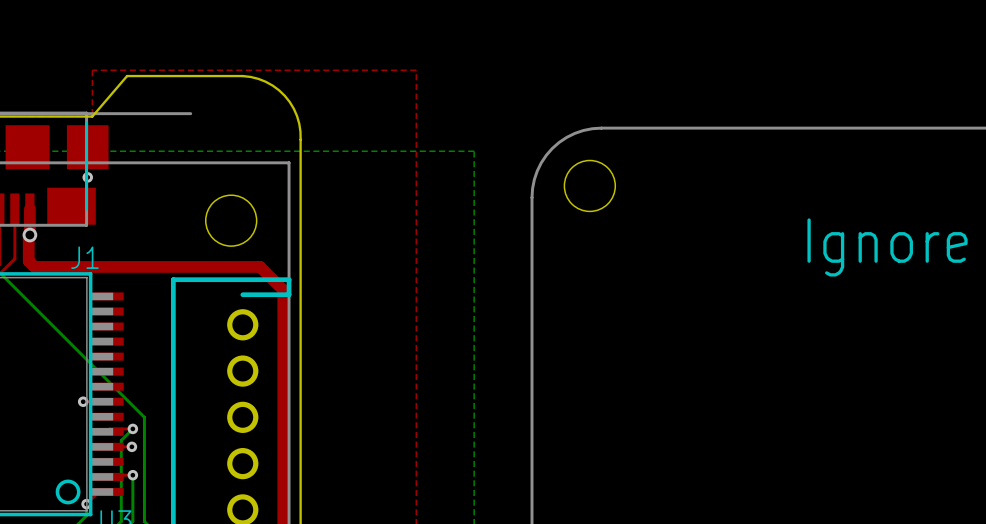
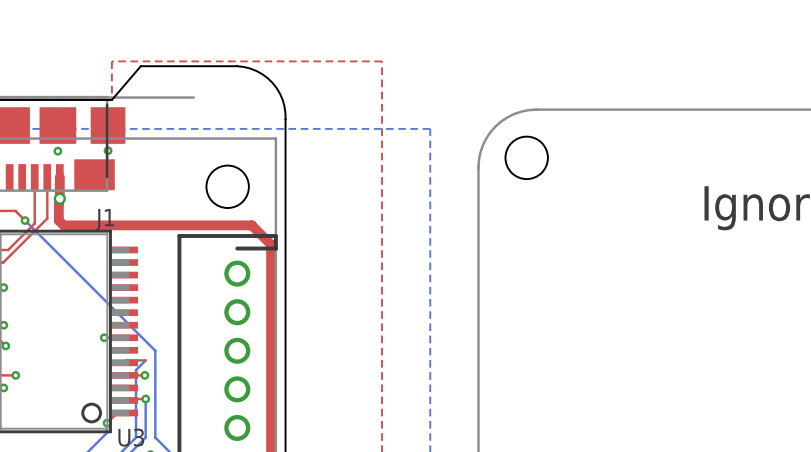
via: none -> (57, 151)
via: (132, 428) -> none

